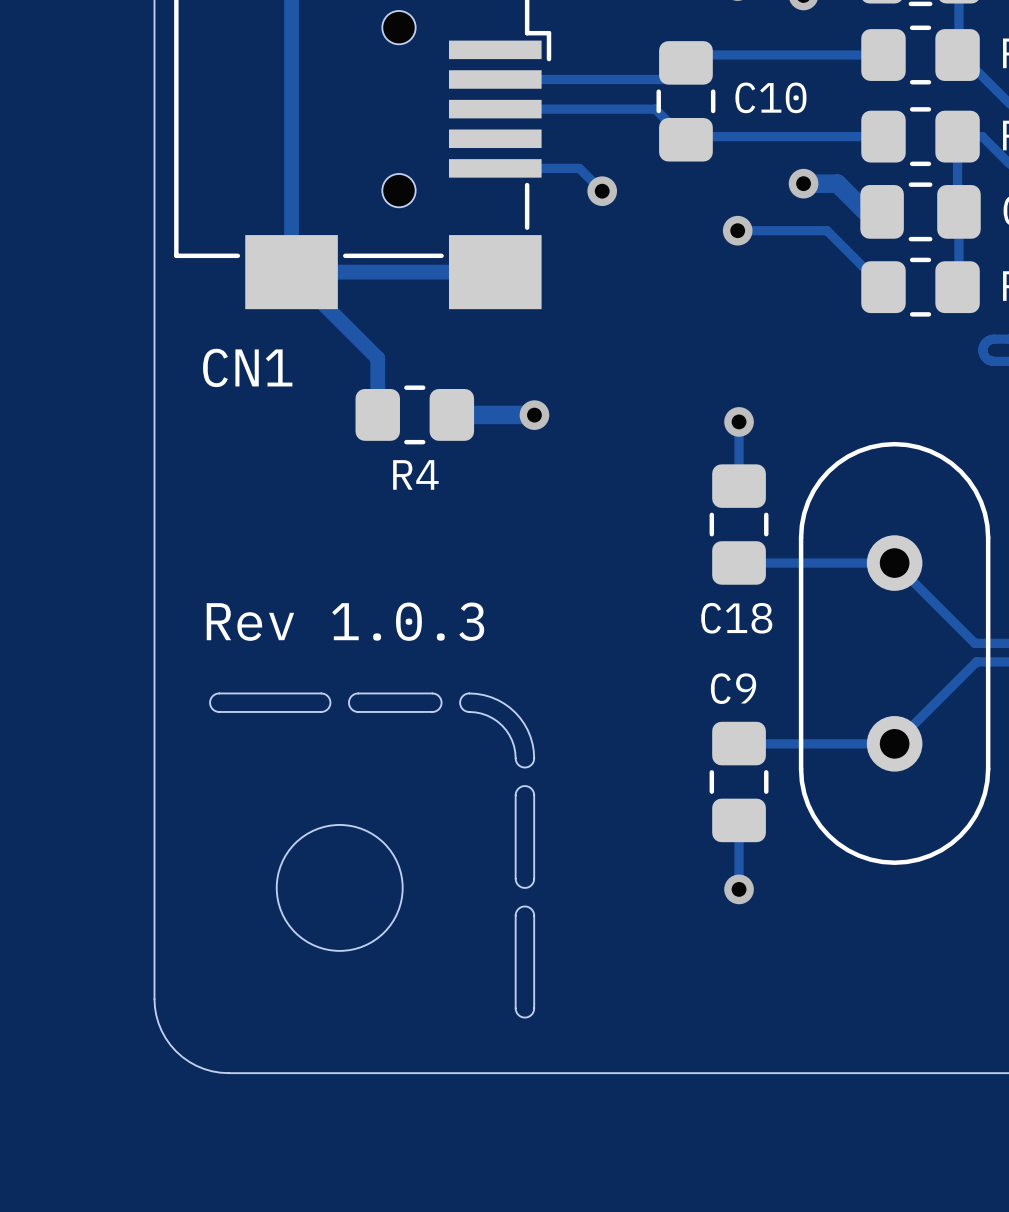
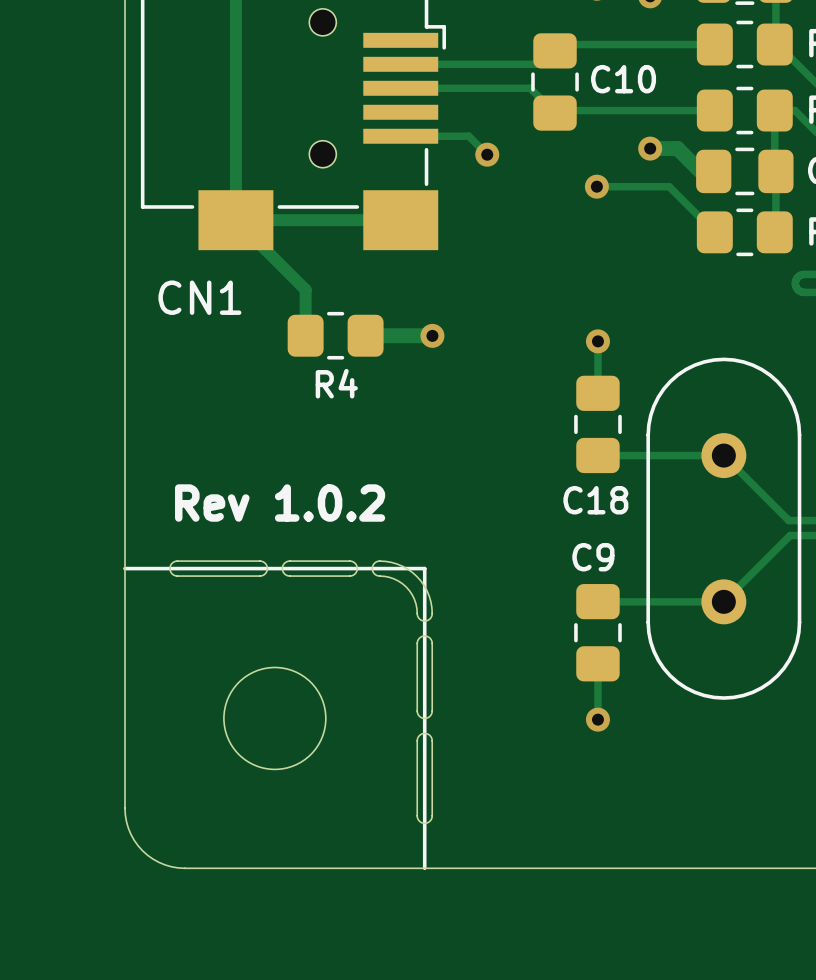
text: Rev 1.0.3 (345, 621) -> Rev 1.0.2 (280, 503)
line: none -> (125, 568) (424, 568) (424, 868)

